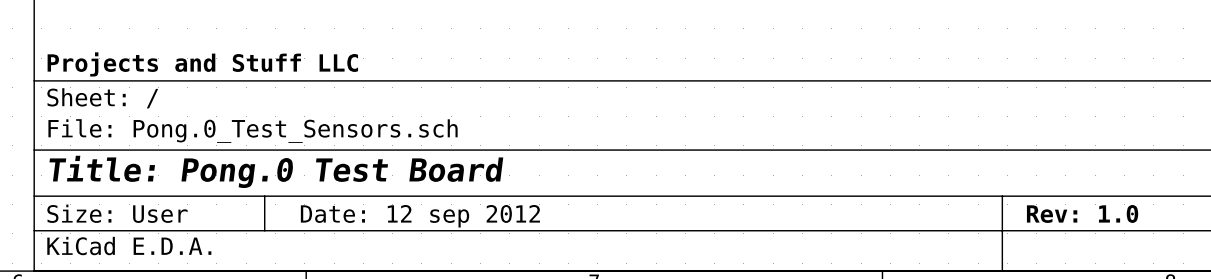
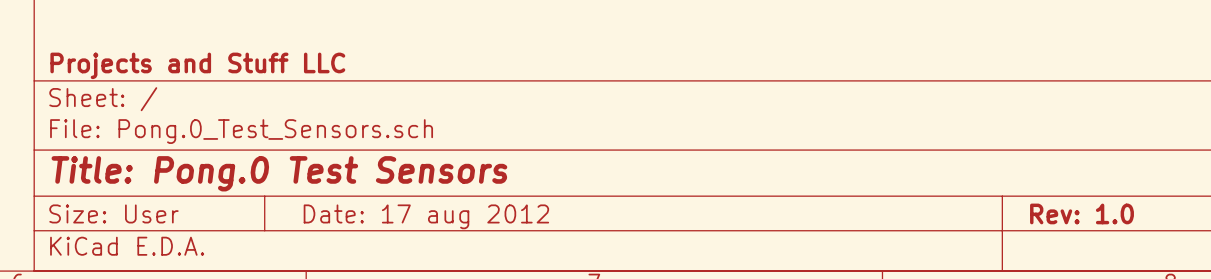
title block: Title: Pong.0 Test Board (276, 171) -> Title: Pong.0 Test Sensors (279, 173)
title block: Date: 12 sep 2012 (420, 216) -> Date: 17 aug 2012 (426, 216)

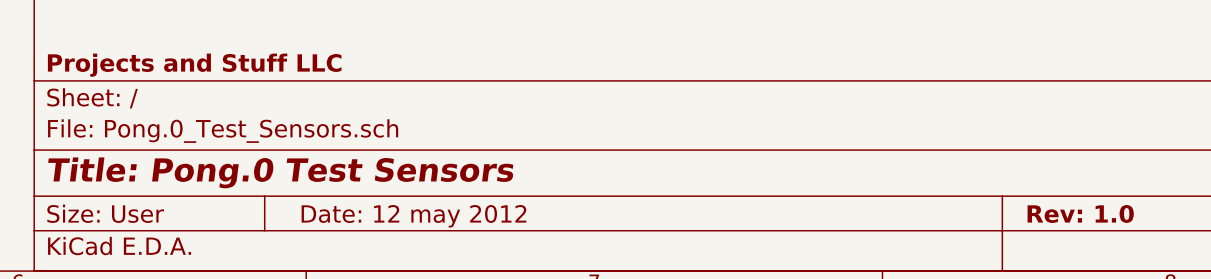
title block: Date: 17 aug 2012 (426, 216) -> Date: 12 may 2012 (413, 216)

